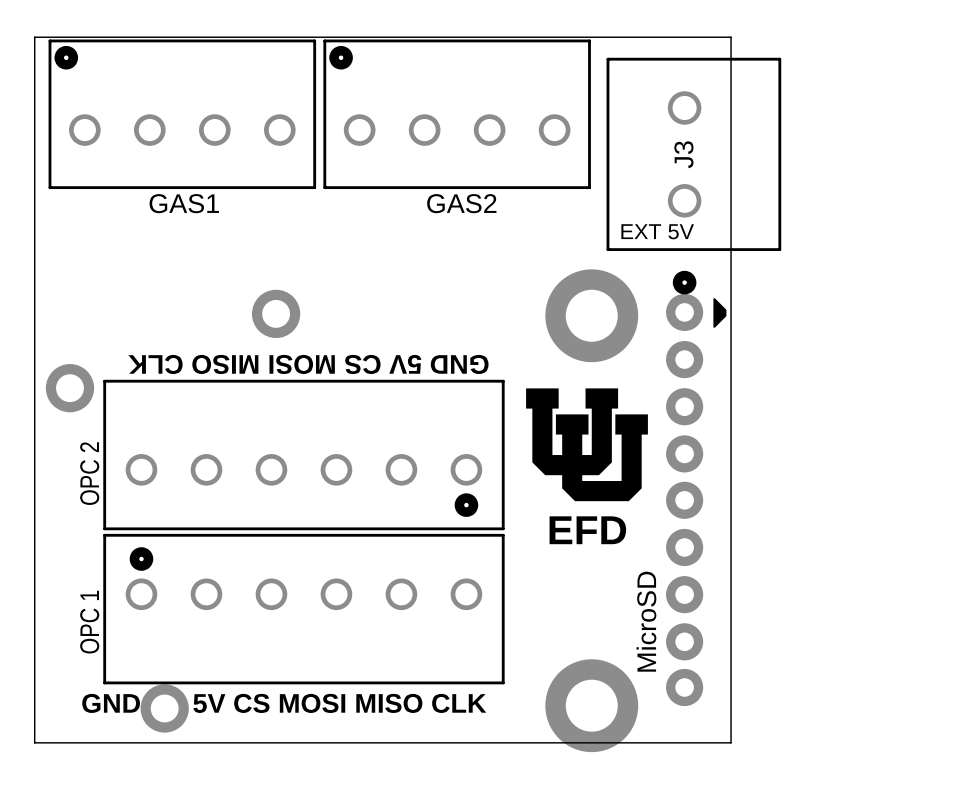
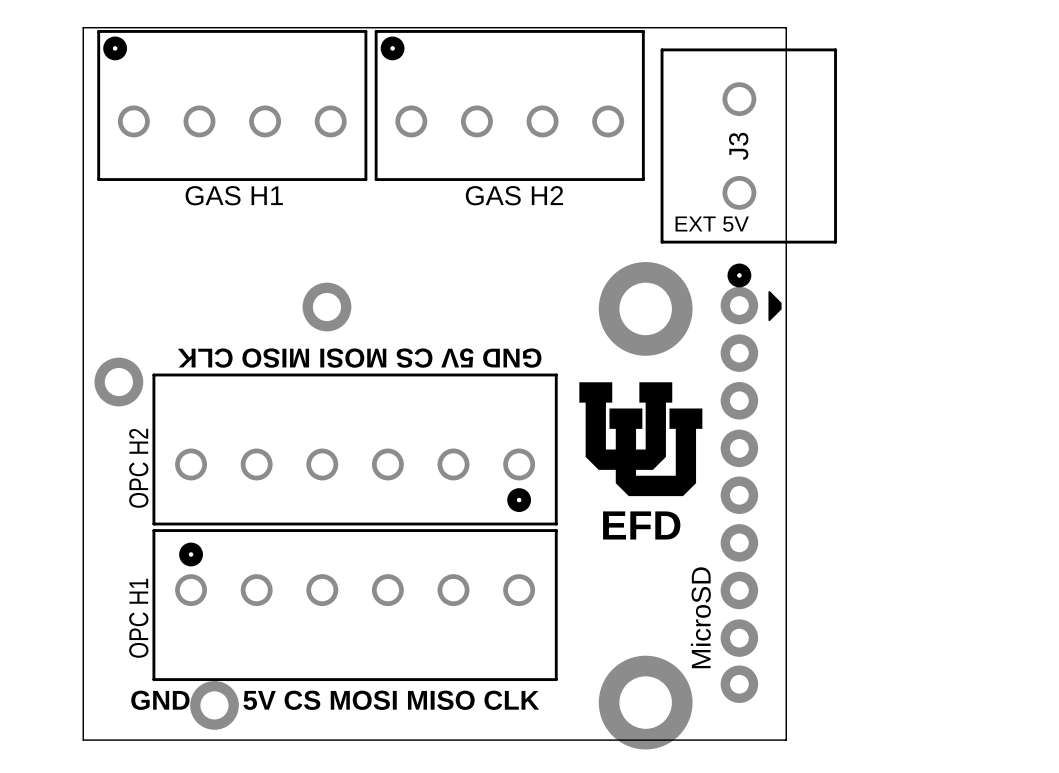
GAS1 name: GAS1 (184, 203) -> GAS H1 (234, 195)
text: GAS2 (461, 203) -> GAS H2 (514, 195)
part value: OPC 2 (89, 473) -> OPC H2 (138, 468)
part value: OPC 1 (89, 622) -> OPC H1 (138, 618)

